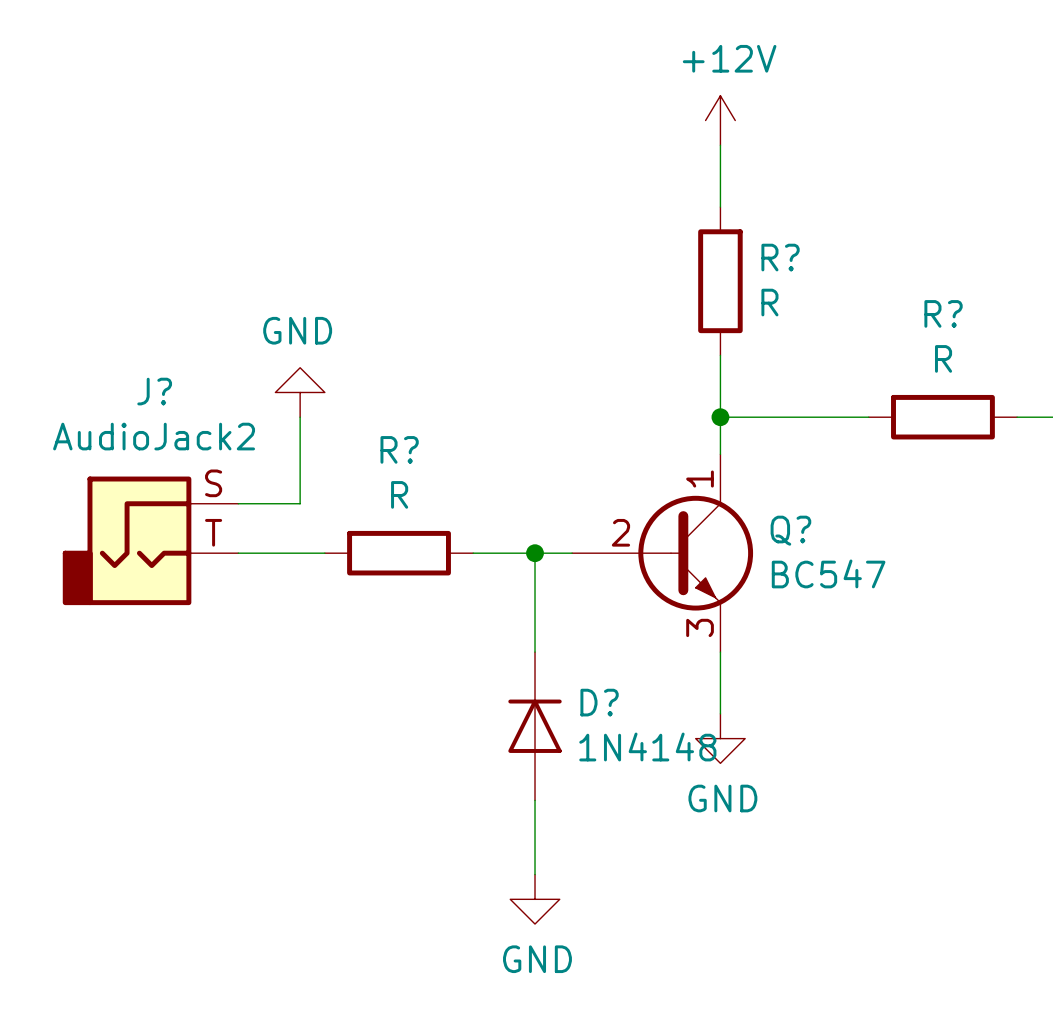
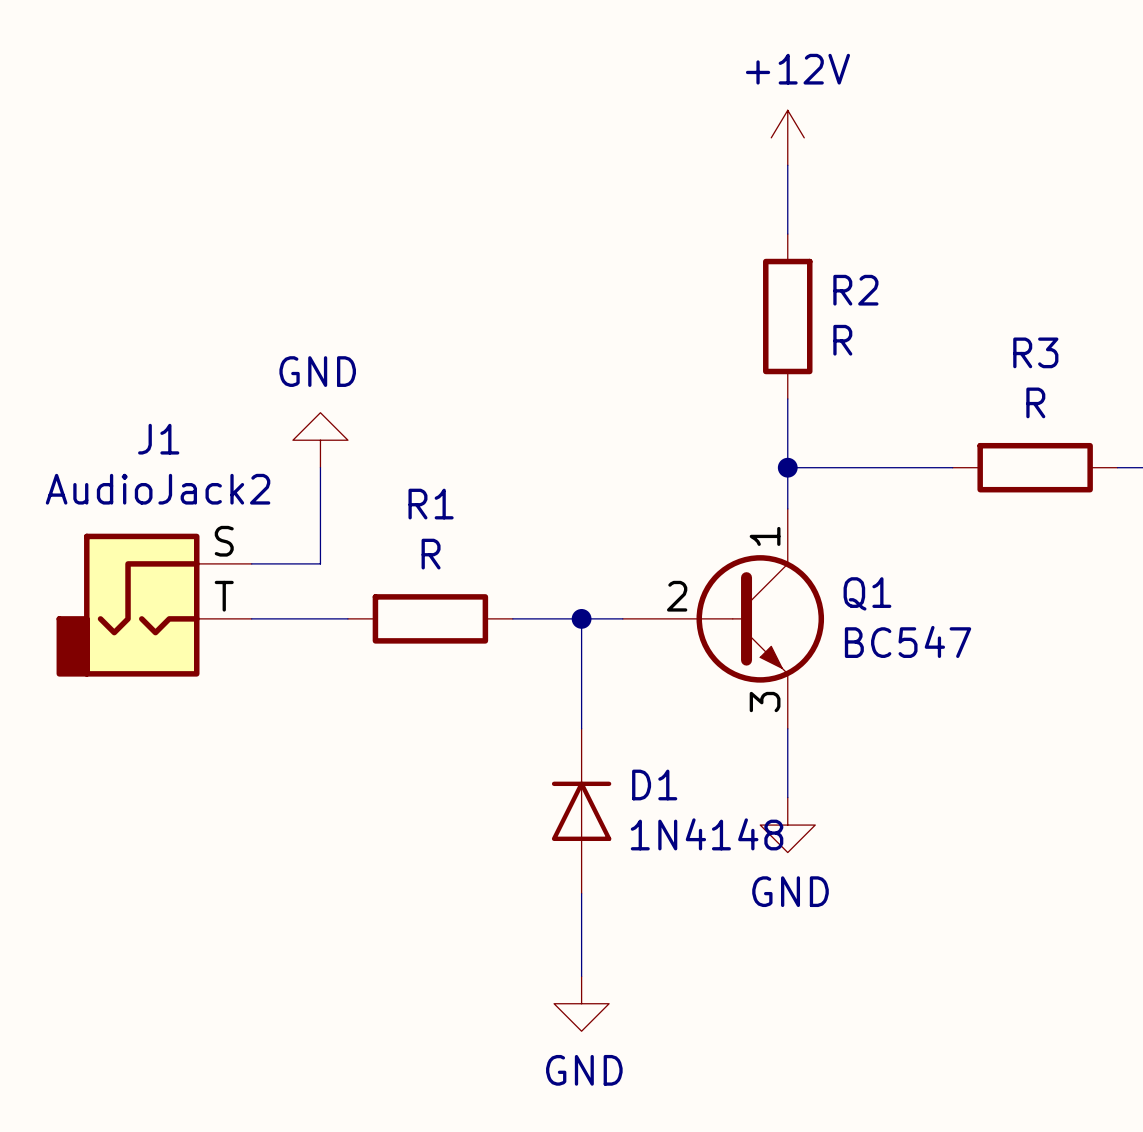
R? name: R? (780, 257) -> R2 (855, 290)
R? name: R? (943, 313) -> R3 (1035, 352)
J? name: J? (154, 391) -> J1 (158, 439)
R? name: R? (399, 449) -> R1 (431, 504)
Q? name: Q? (790, 530) -> Q1 (867, 593)
D? name: D? (599, 702) -> D1 (654, 785)

